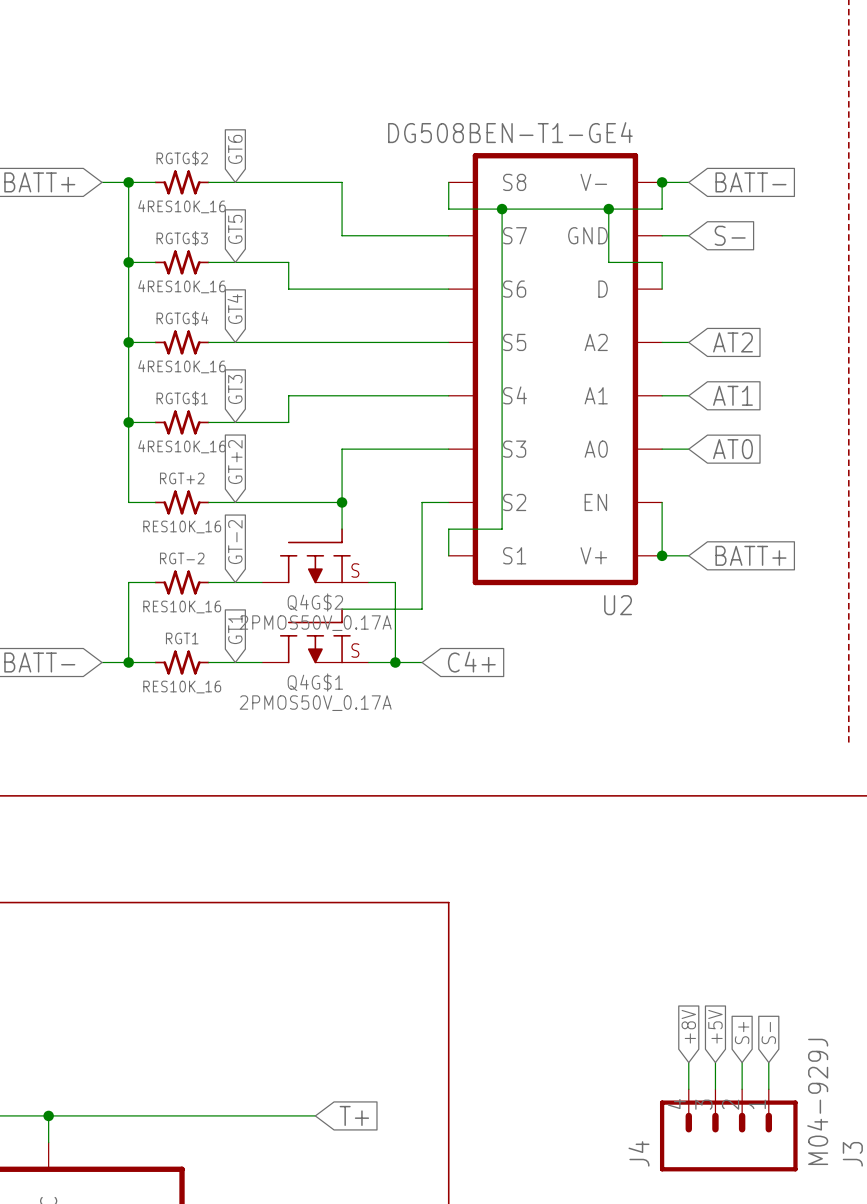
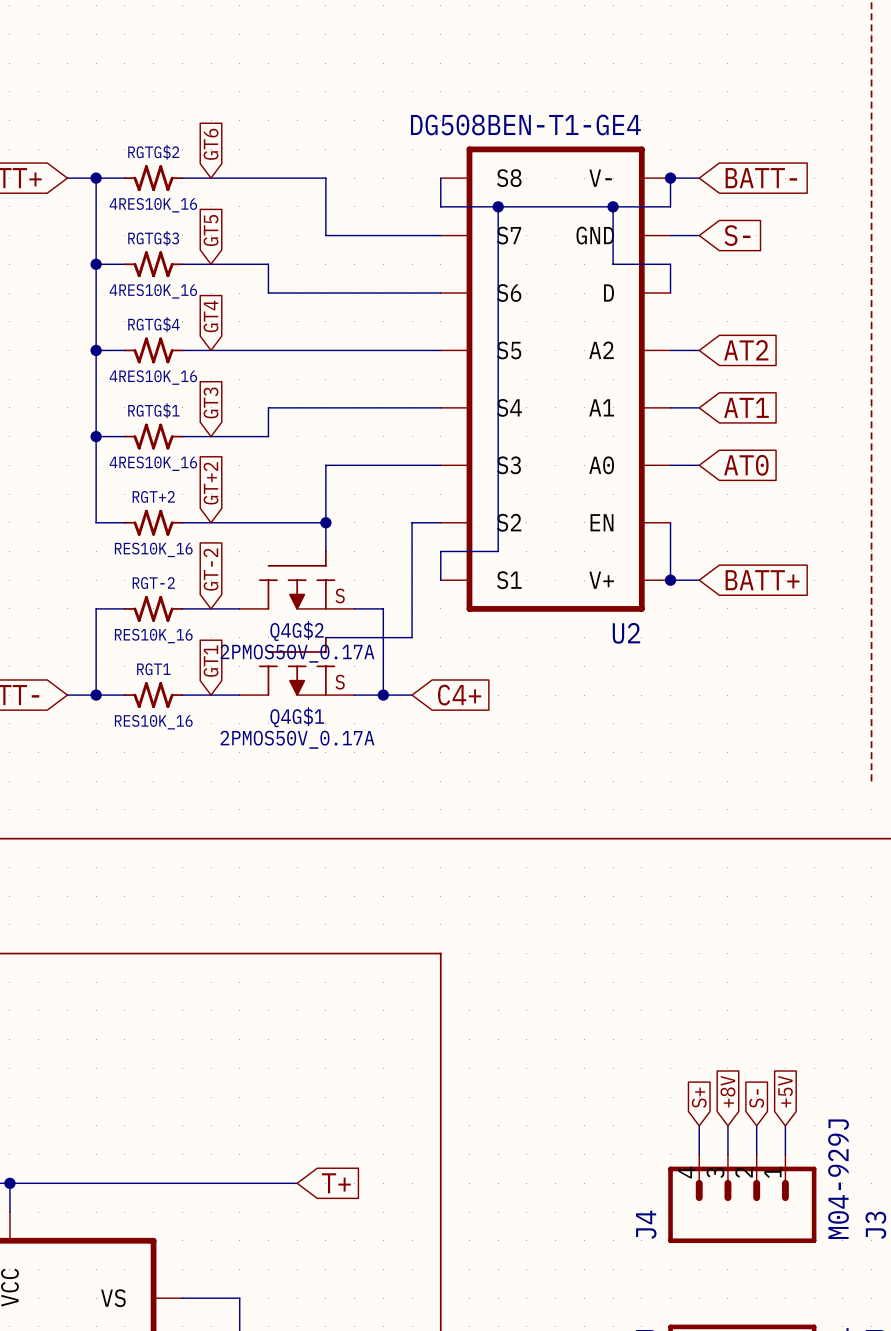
global label: +8V (688, 1026) -> S+ (699, 1097)
global label: +5V (715, 1026) -> +8V (727, 1091)
global label: S+ (742, 1033) -> S- (756, 1098)
global label: S- (768, 1033) -> +5V (785, 1091)

